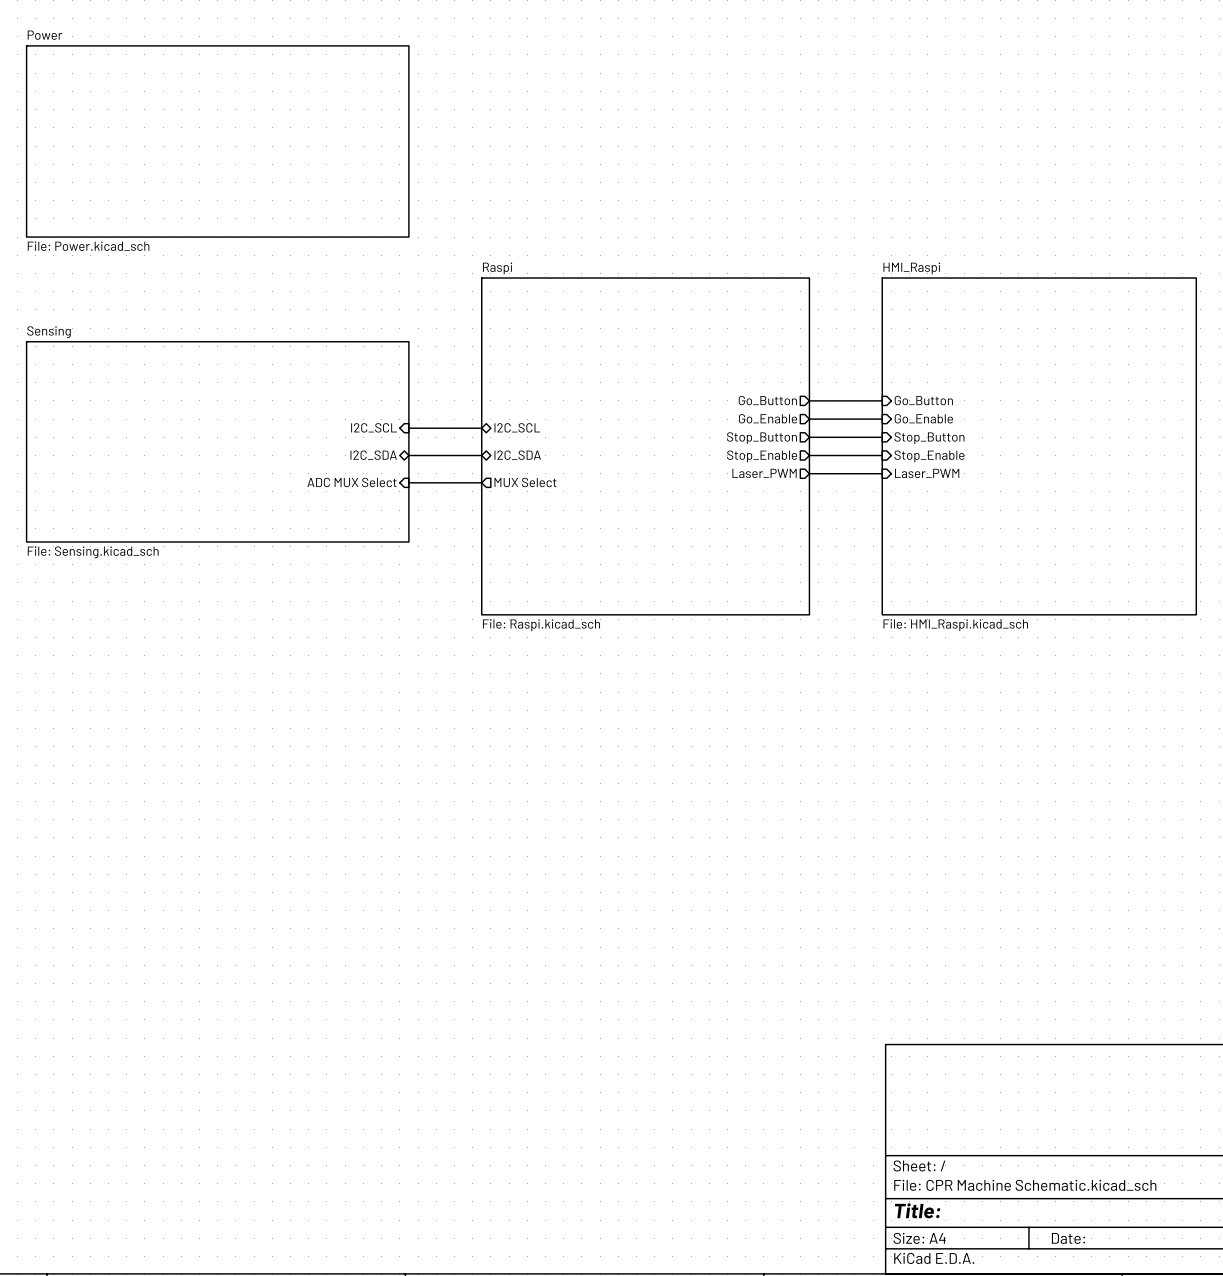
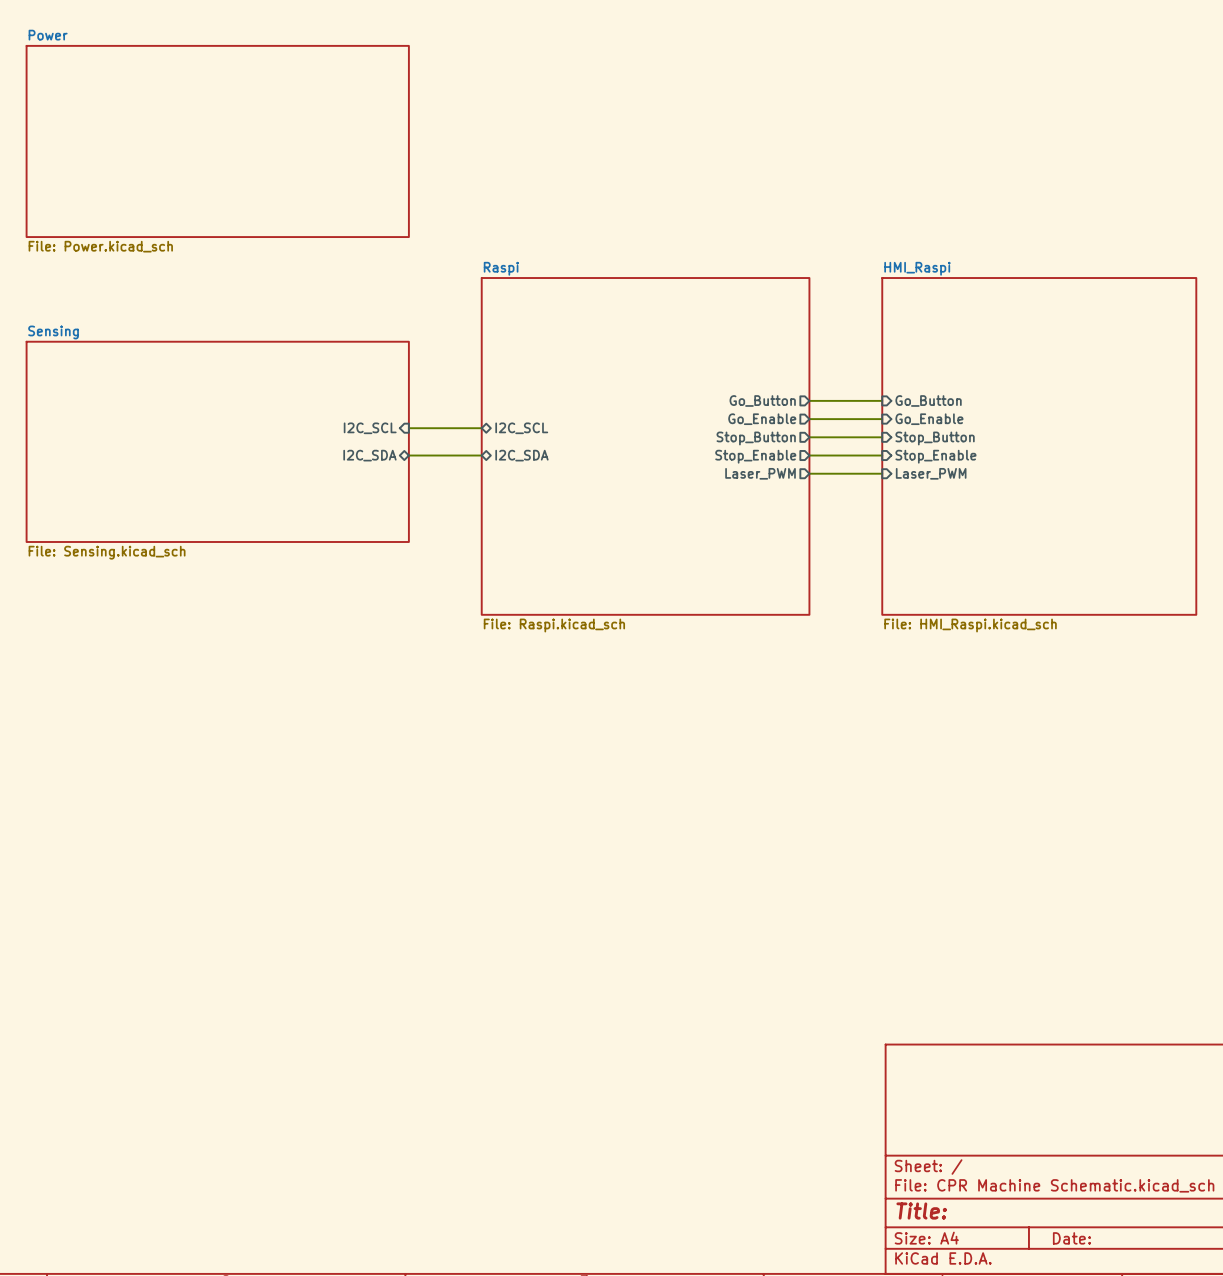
sheet pin: ADC MUX Select (352, 482) -> none
wire: (408, 482) (481, 482) -> none
sheet pin: MUX Select (525, 482) -> none

